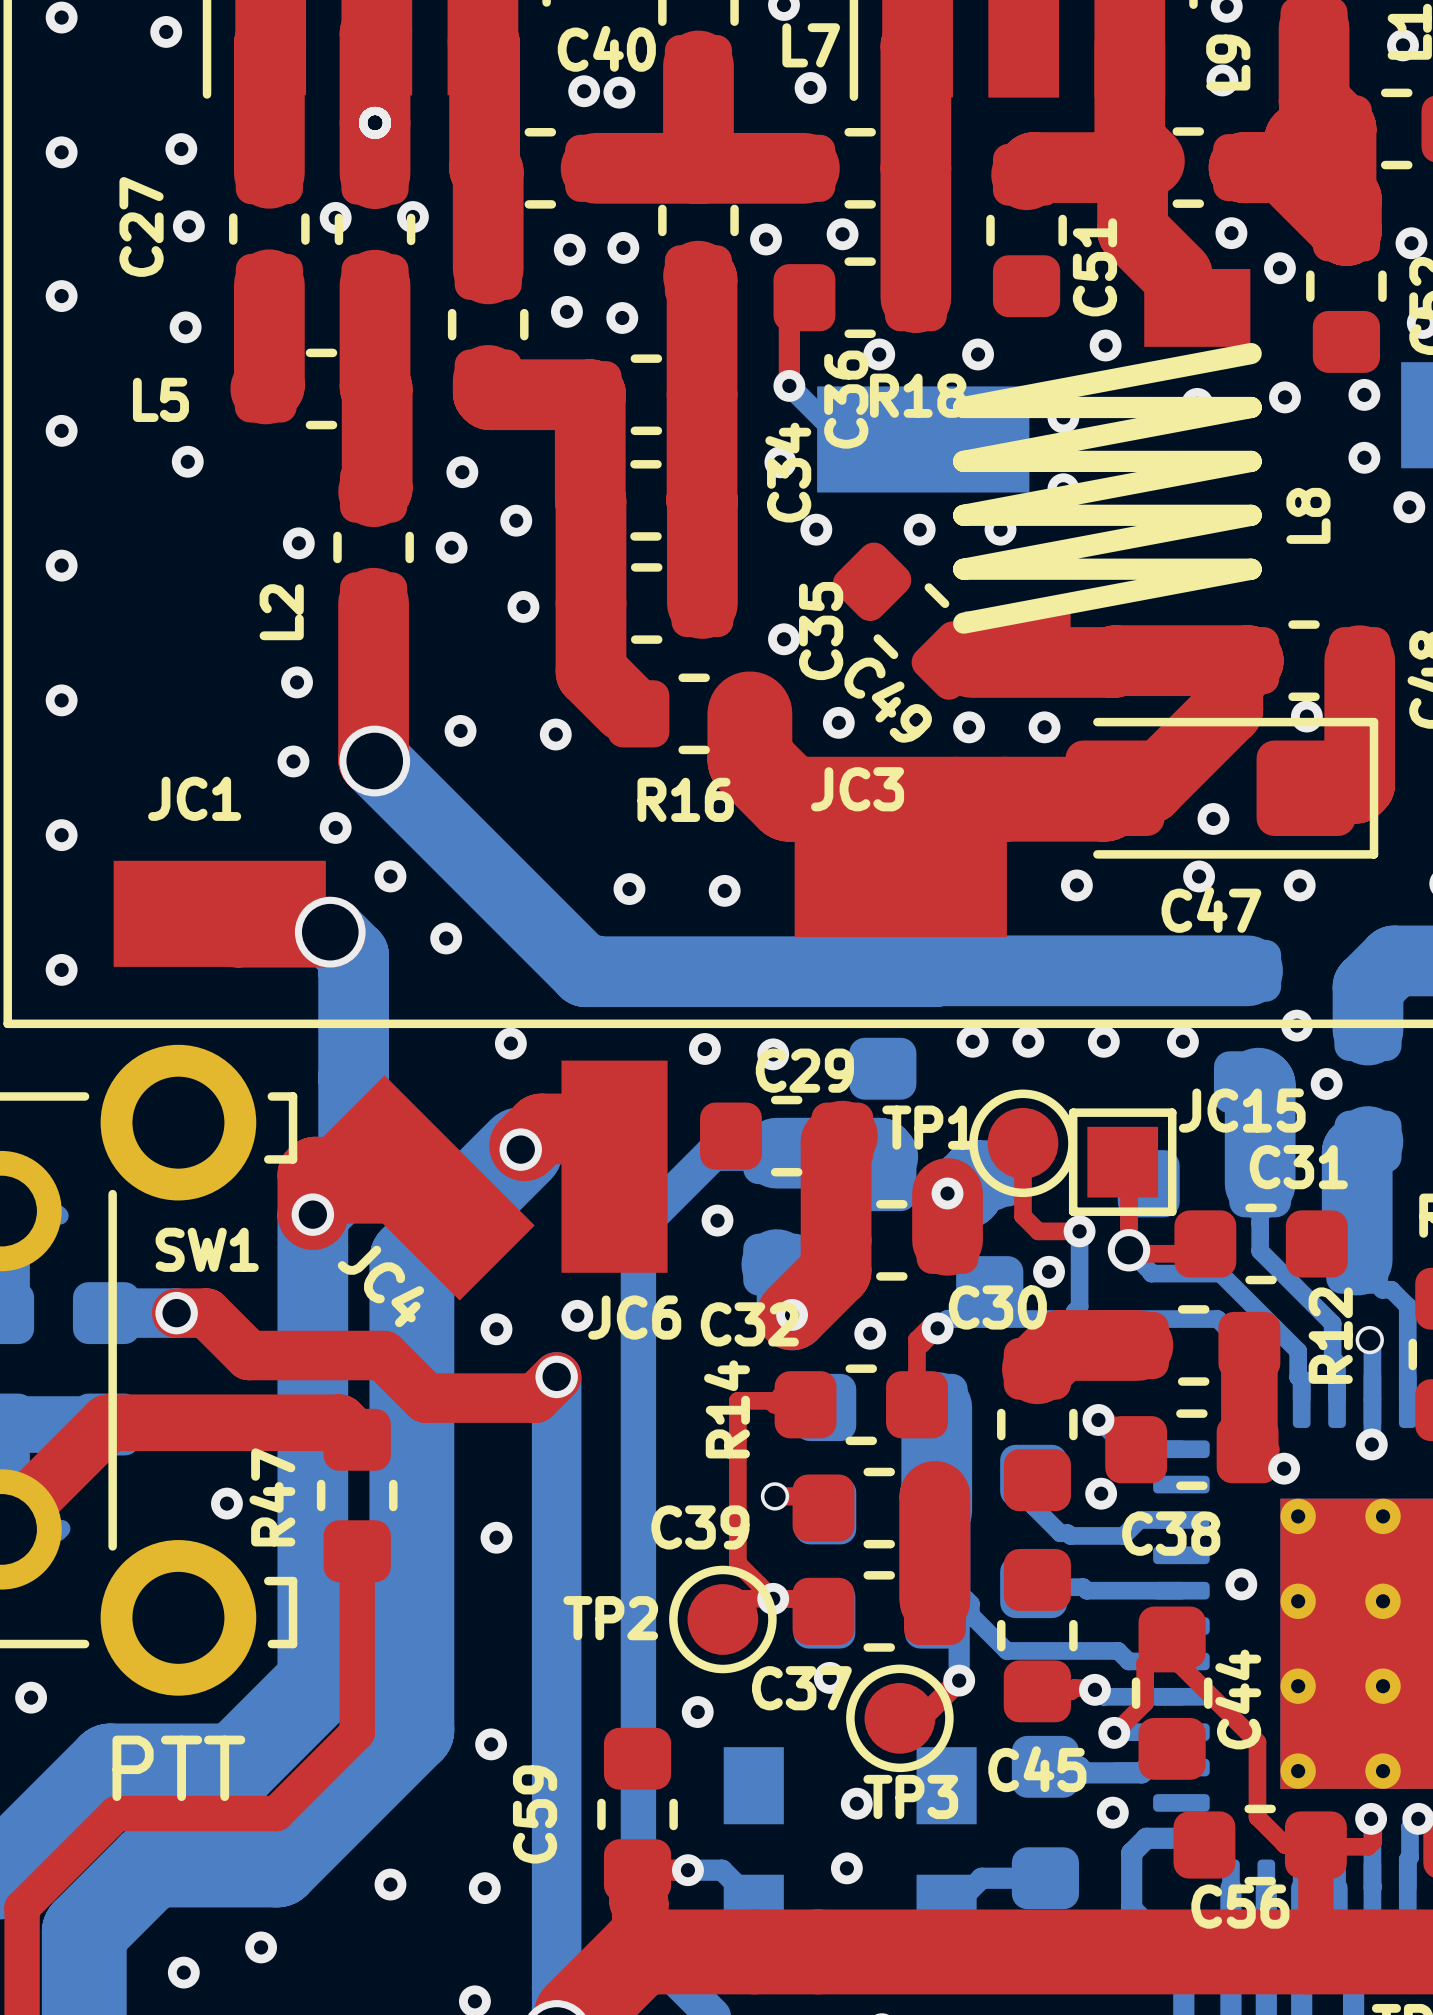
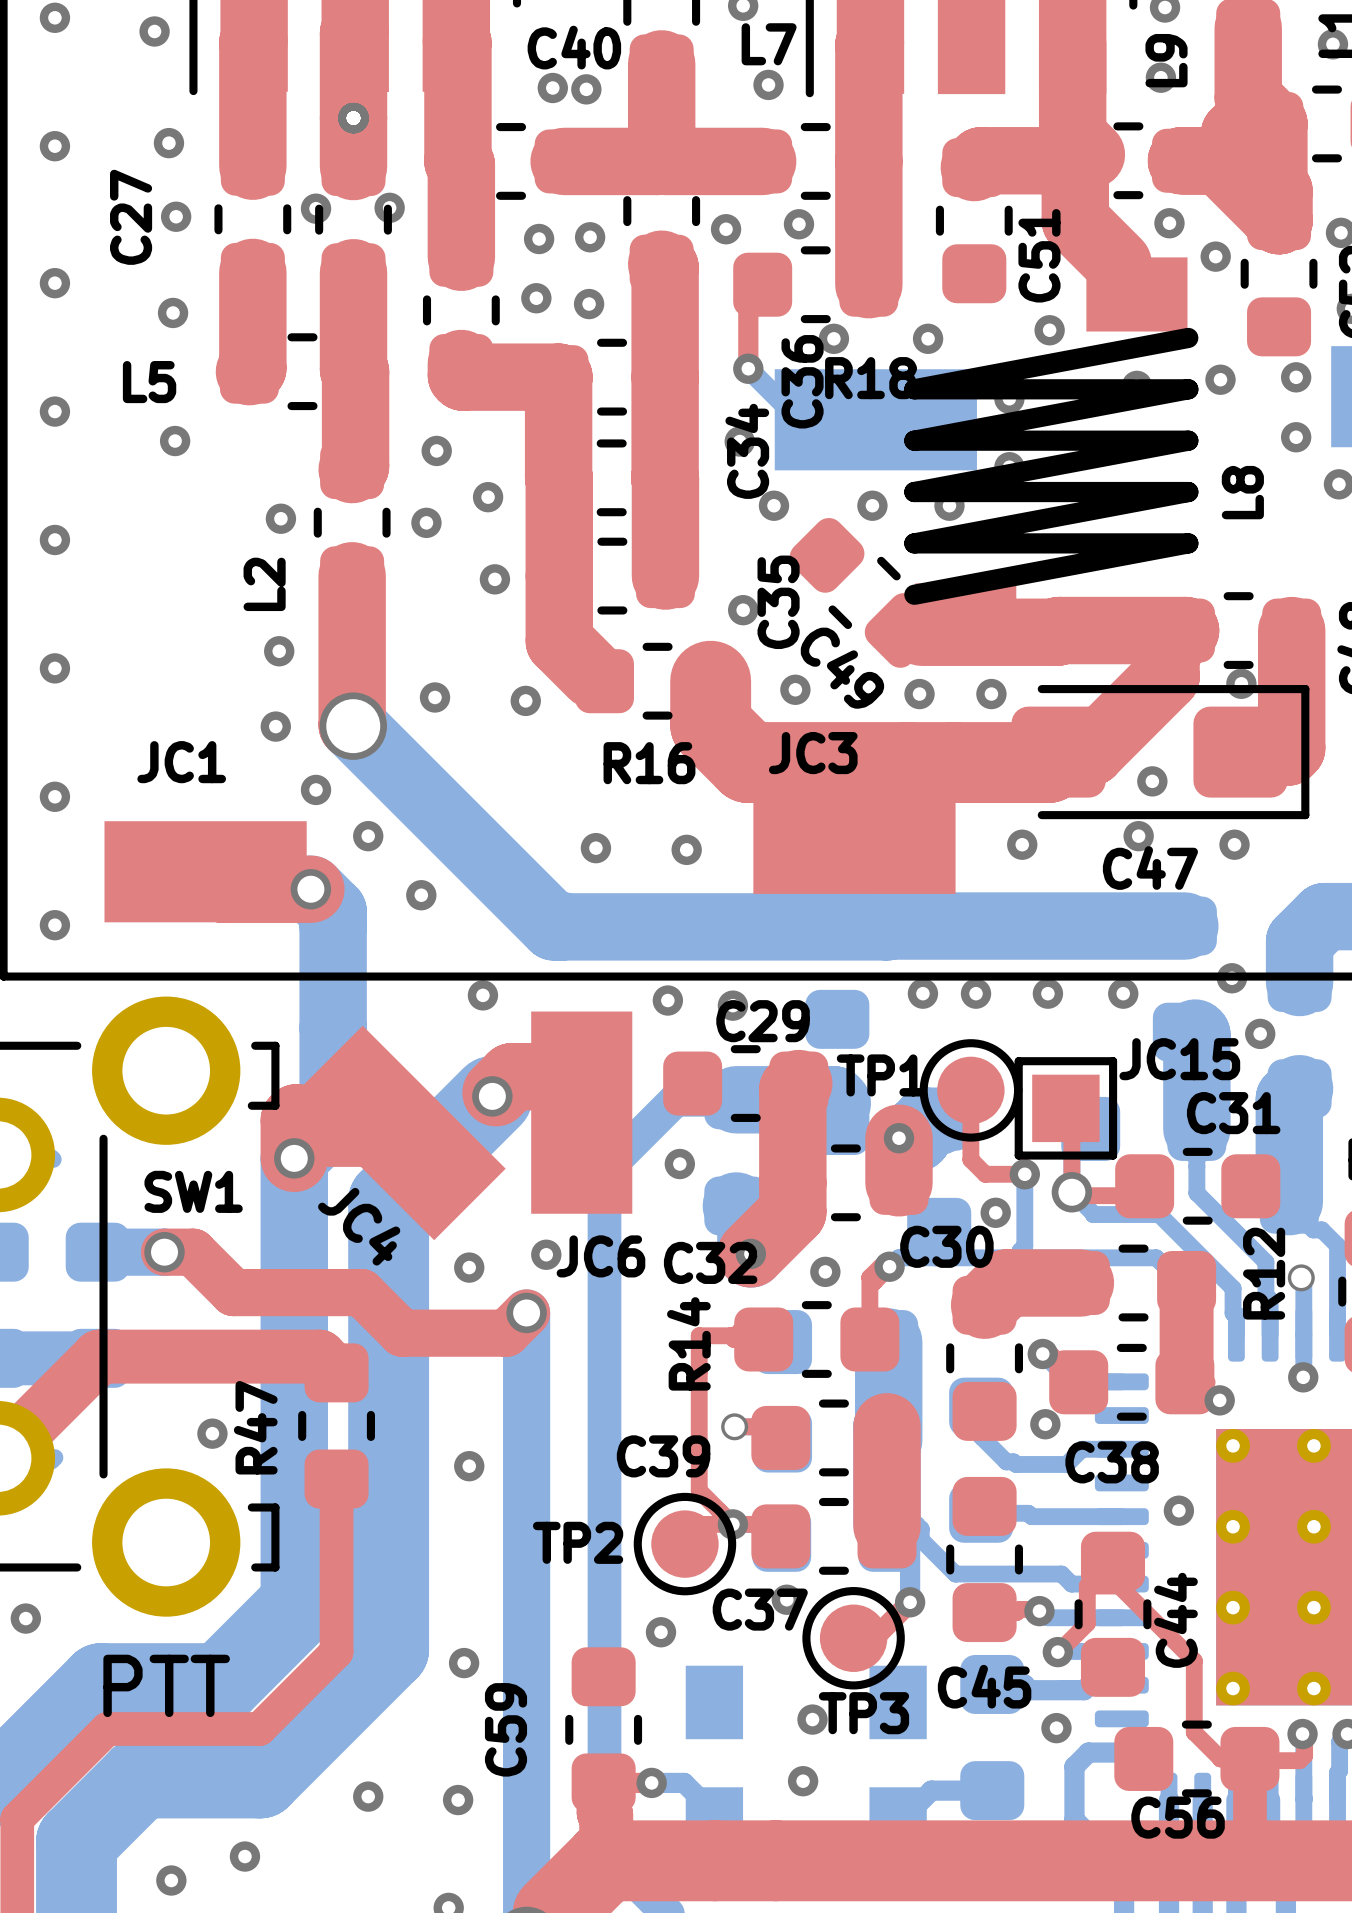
via size: [294, 896, 366, 968] -> [290, 869, 332, 910]

